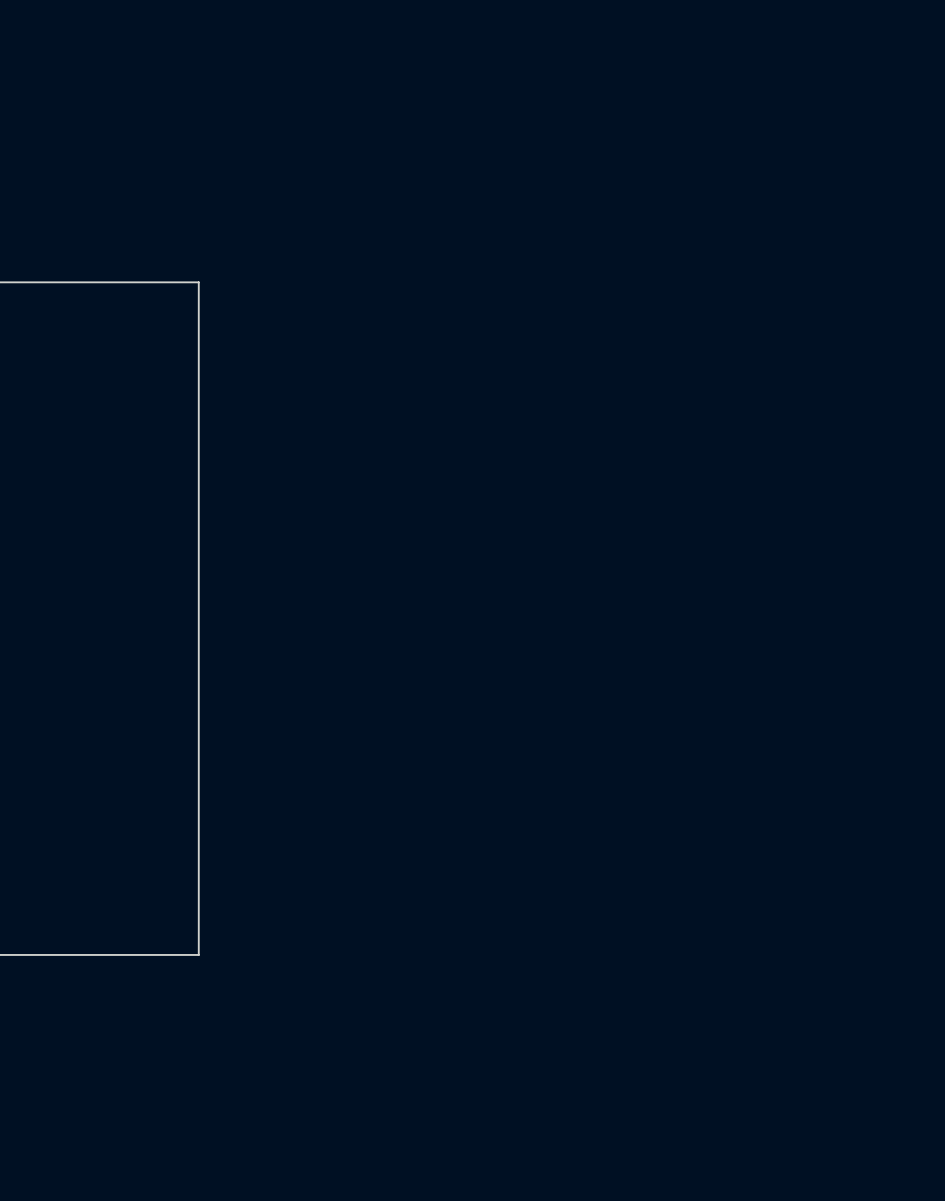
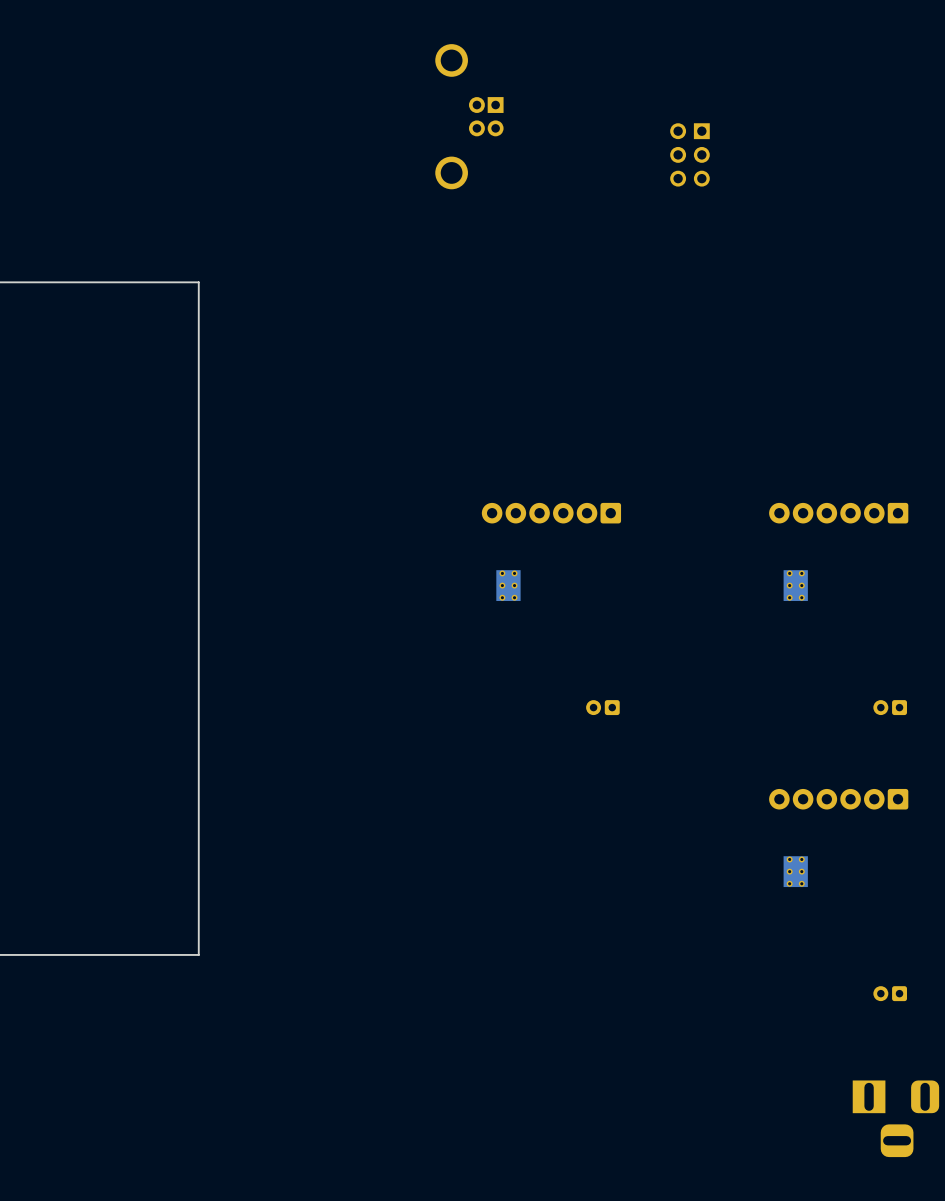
part: none -> (469, 116)
part: none -> (689, 154)
part: none -> (551, 513)
part: none -> (838, 513)
part: none -> (508, 585)
part: none -> (795, 585)
part: none -> (602, 707)
part: none -> (890, 707)
part: none -> (838, 799)
part: none -> (795, 871)
part: none -> (890, 993)
part: none -> (895, 1118)

